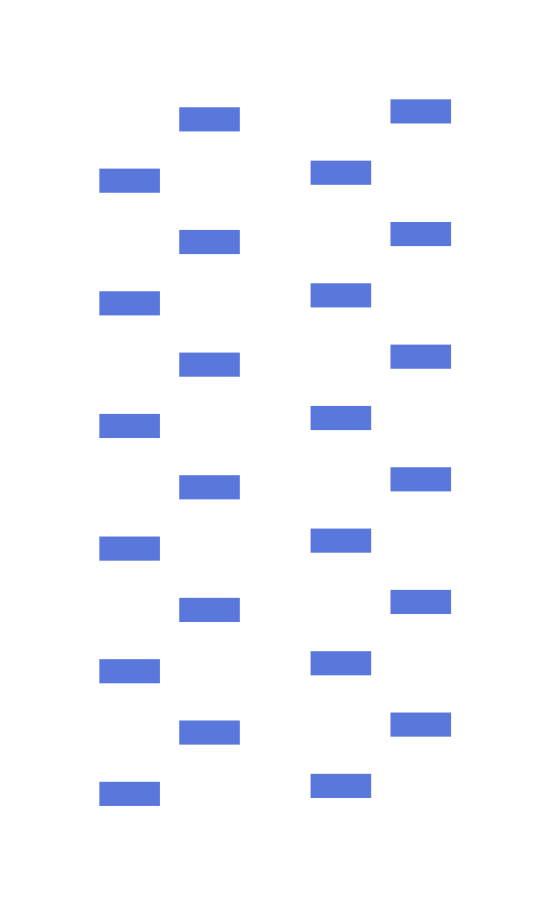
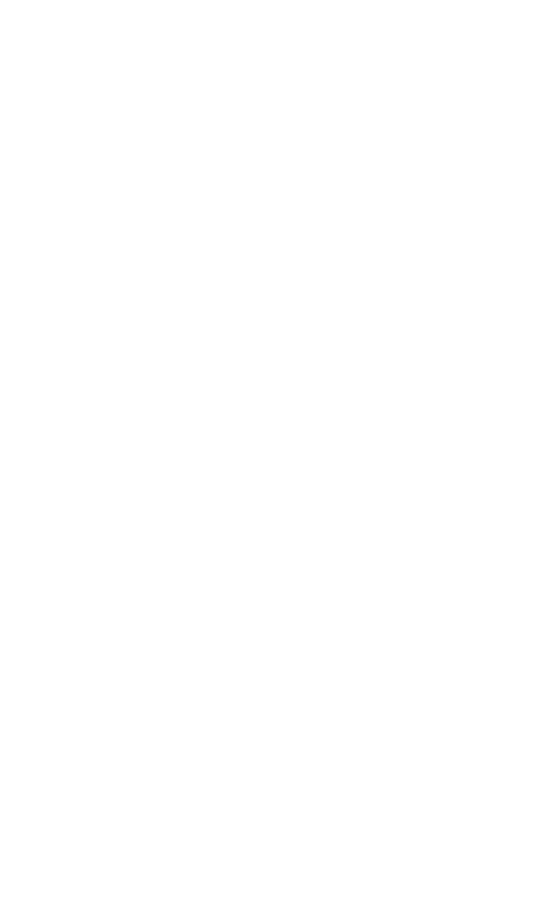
part: (380, 448) -> none
part: (169, 456) -> none

